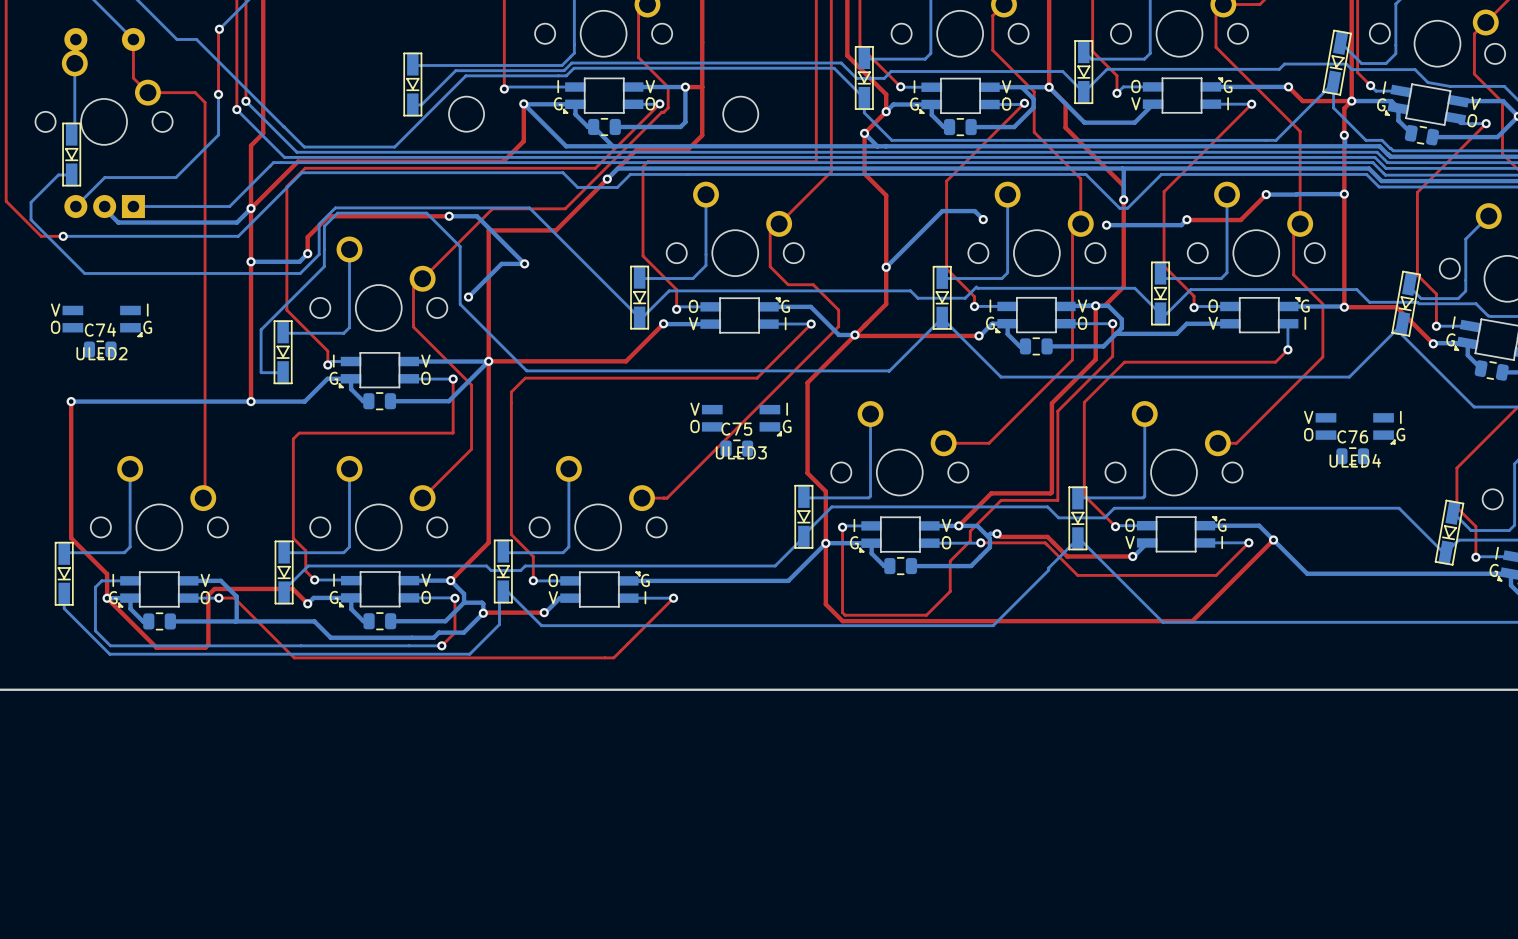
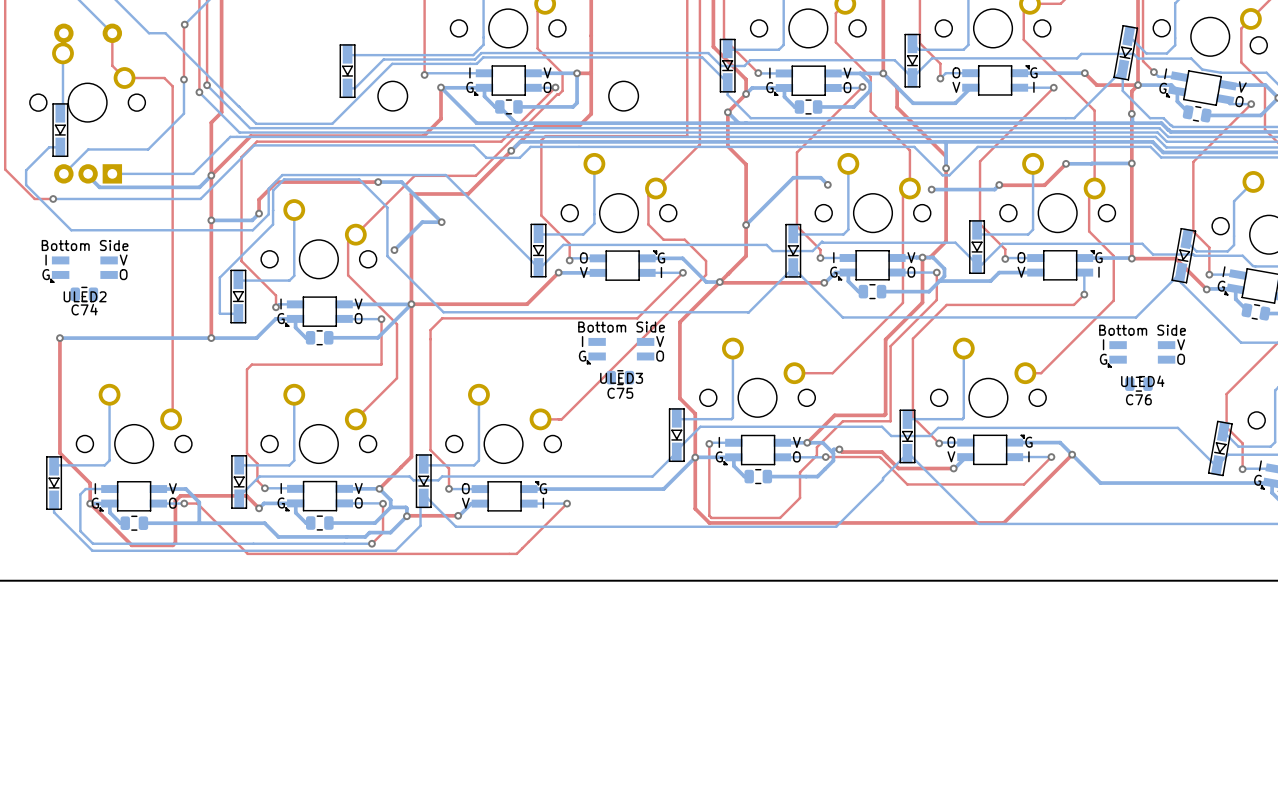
ULED2 footprint: [62, 305, 143, 338] -> [50, 256, 118, 283]
C74 name position: C74 (100, 329) -> C74 (84, 309)
ULED3 footprint: [701, 404, 782, 437] -> [586, 337, 655, 365]
ULED4 footprint: [1315, 413, 1396, 445] -> [1107, 341, 1176, 368]
C75 name position: C75 (736, 429) -> C75 (620, 393)
C76 name position: C76 (1352, 436) -> C76 (1138, 399)

